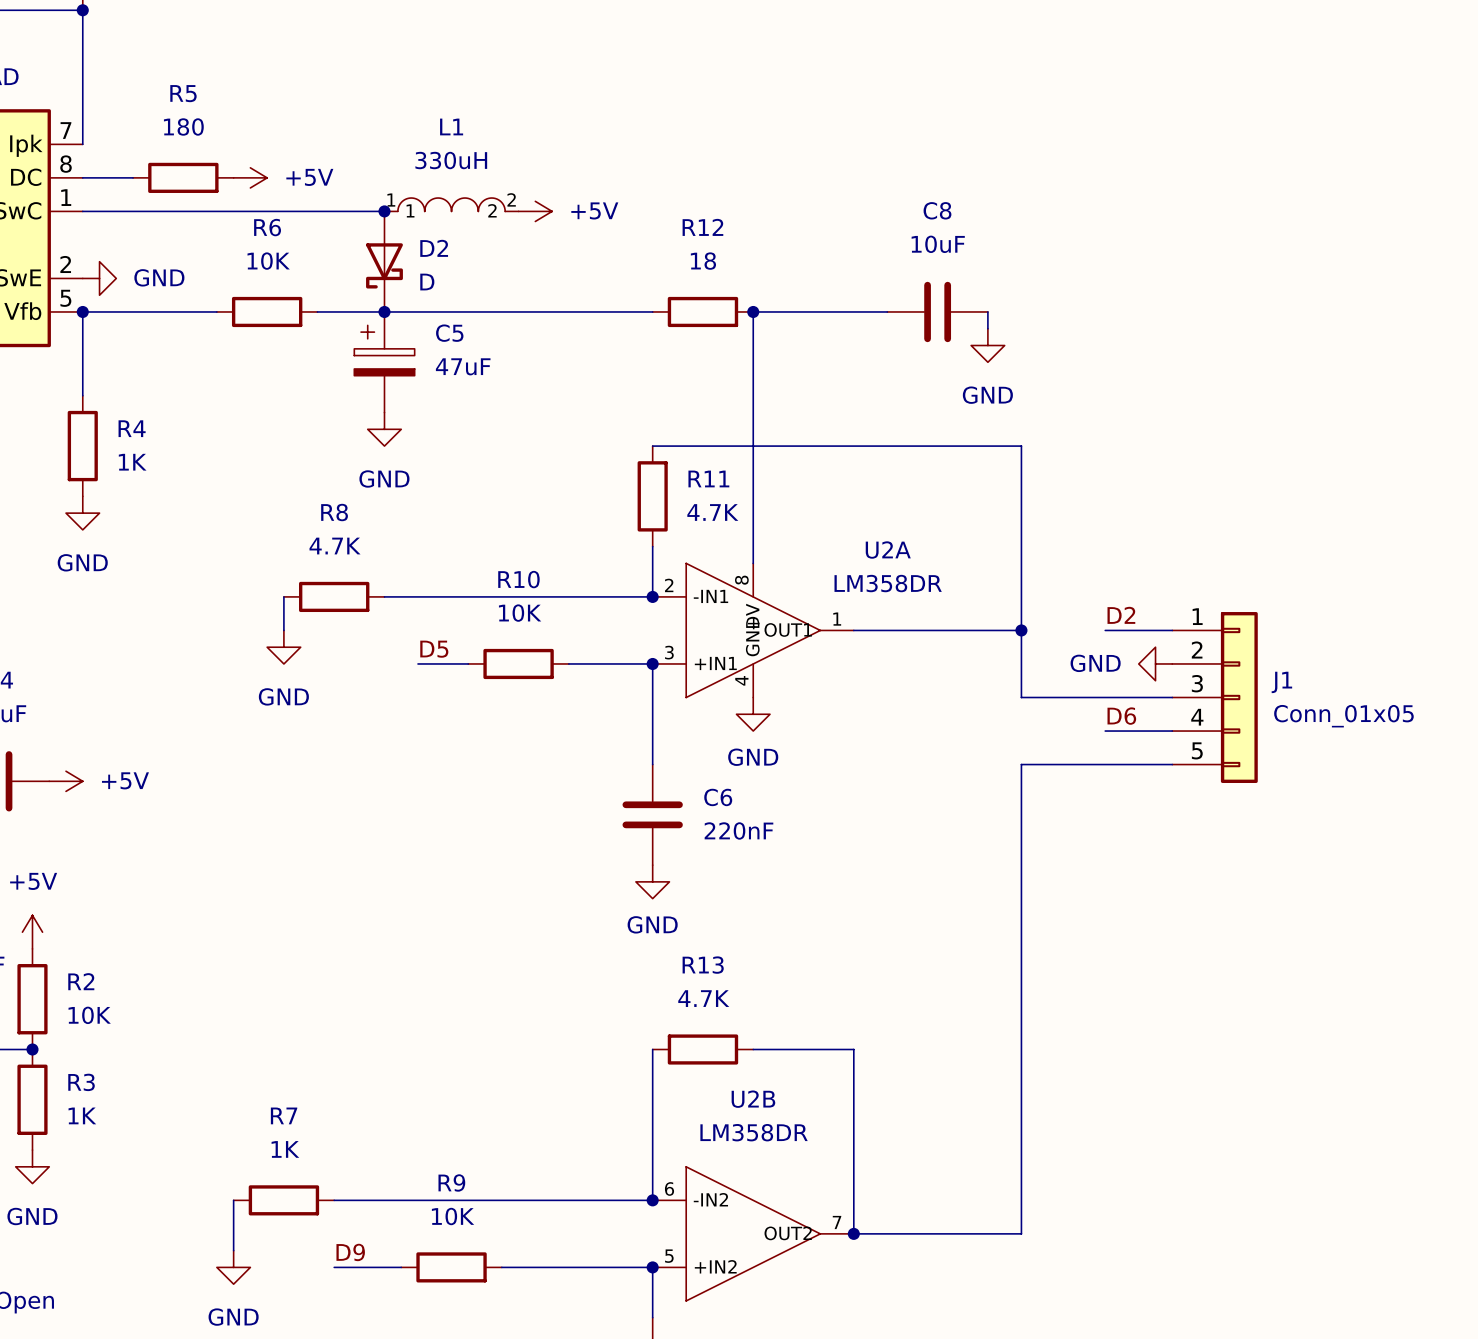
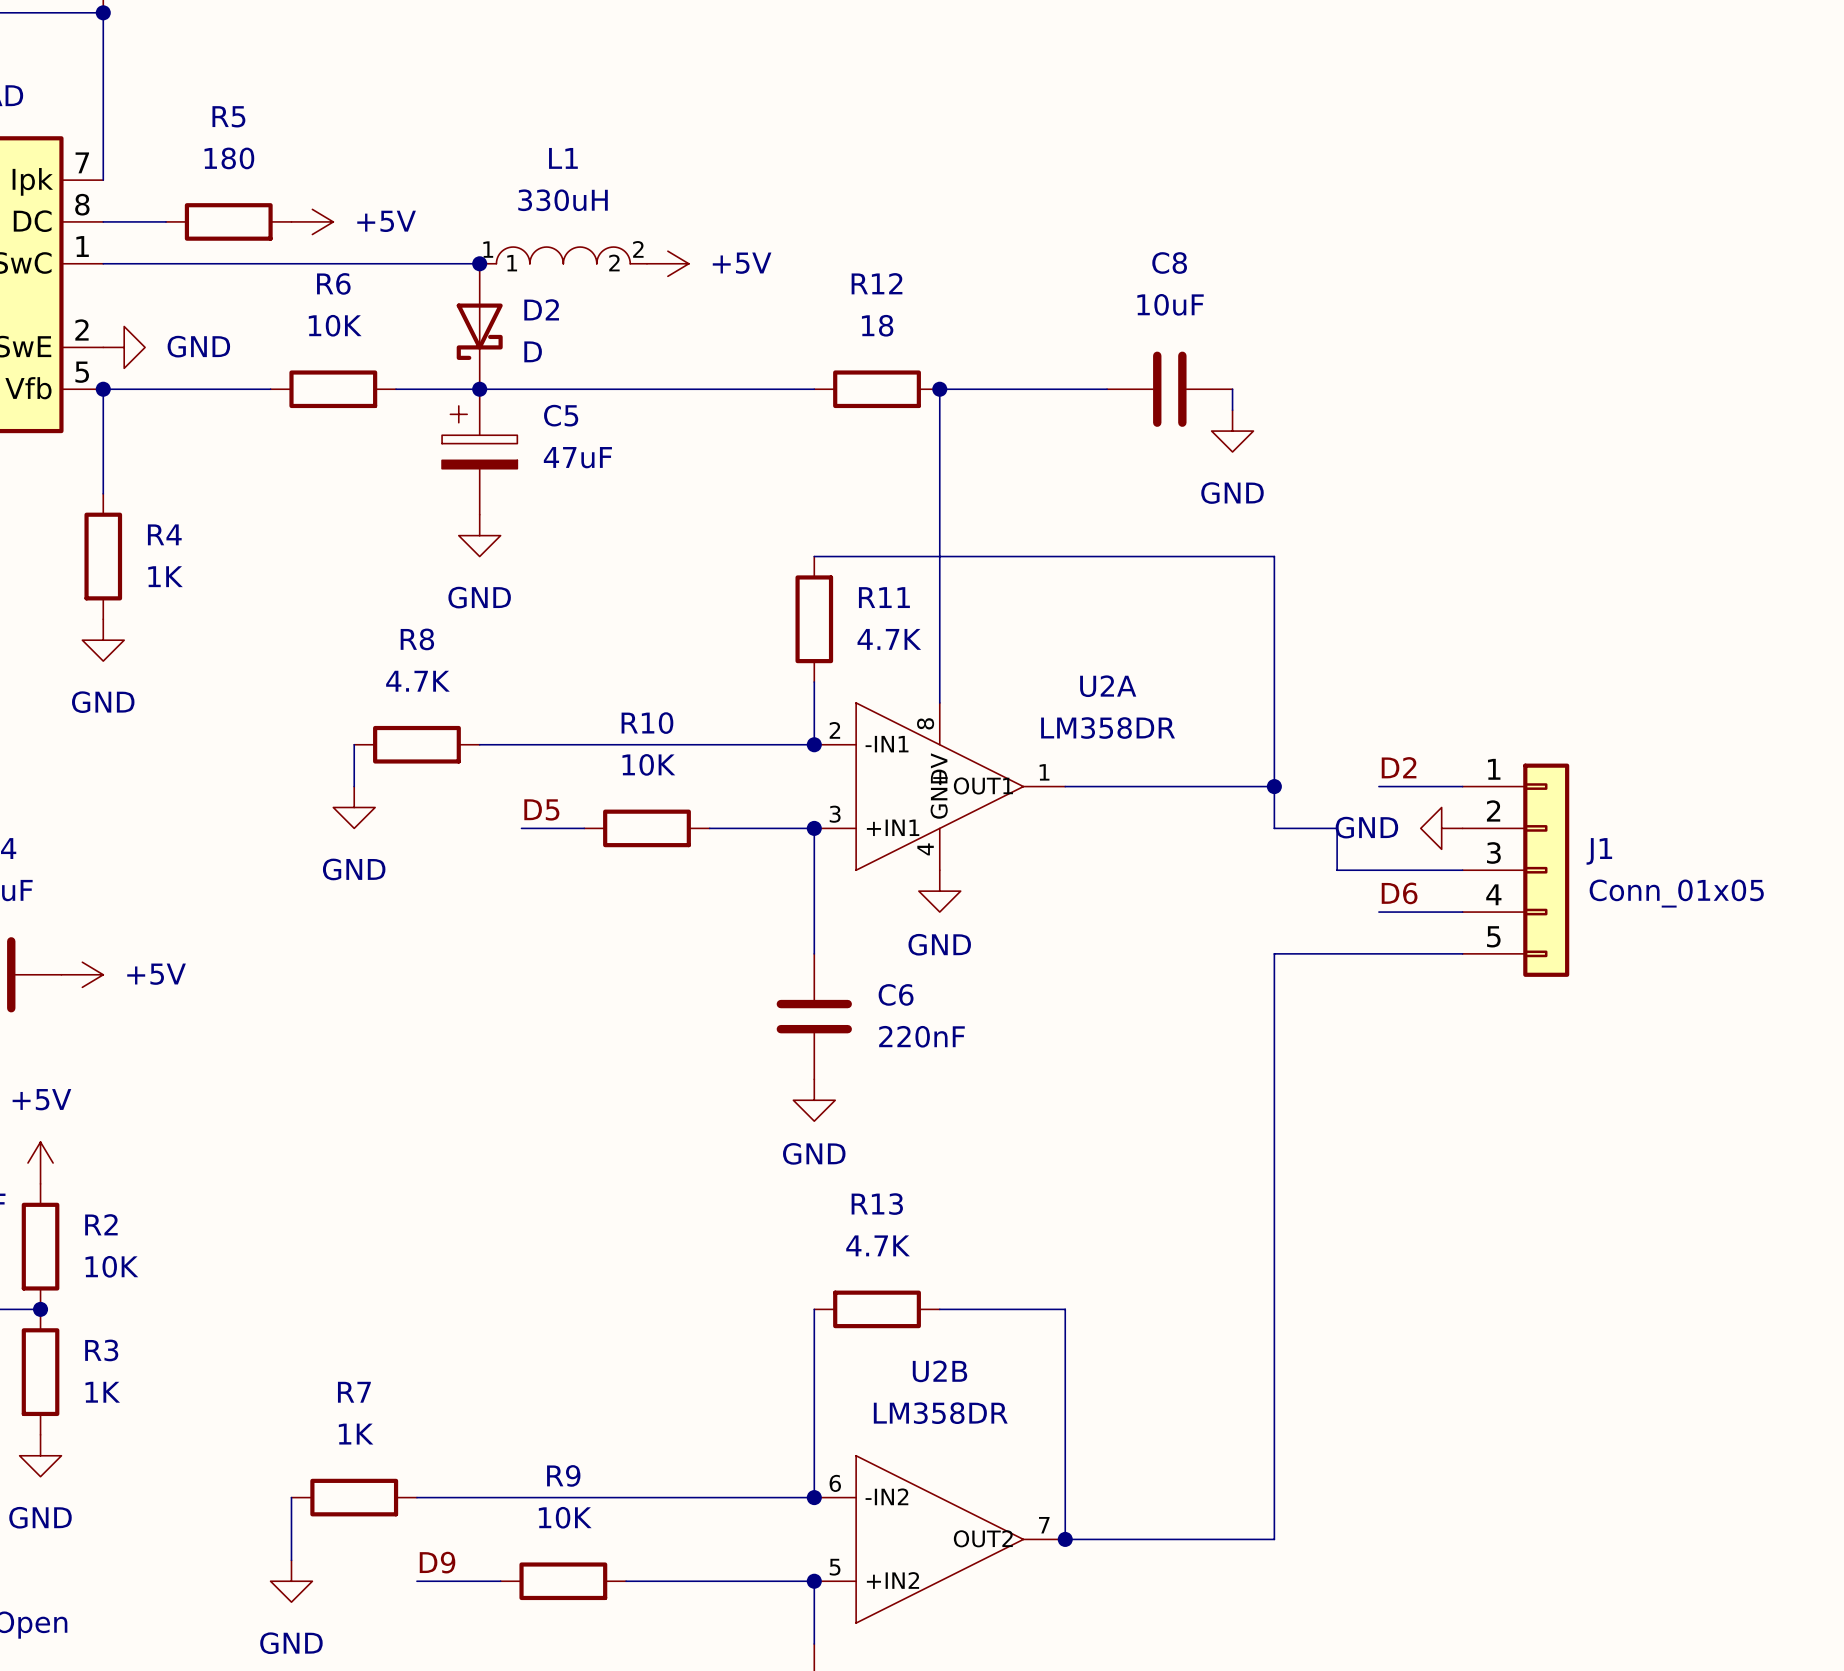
wire: (1021, 663) (1021, 697) (1071, 697) -> (1274, 828) (1337, 828) (1337, 870)

